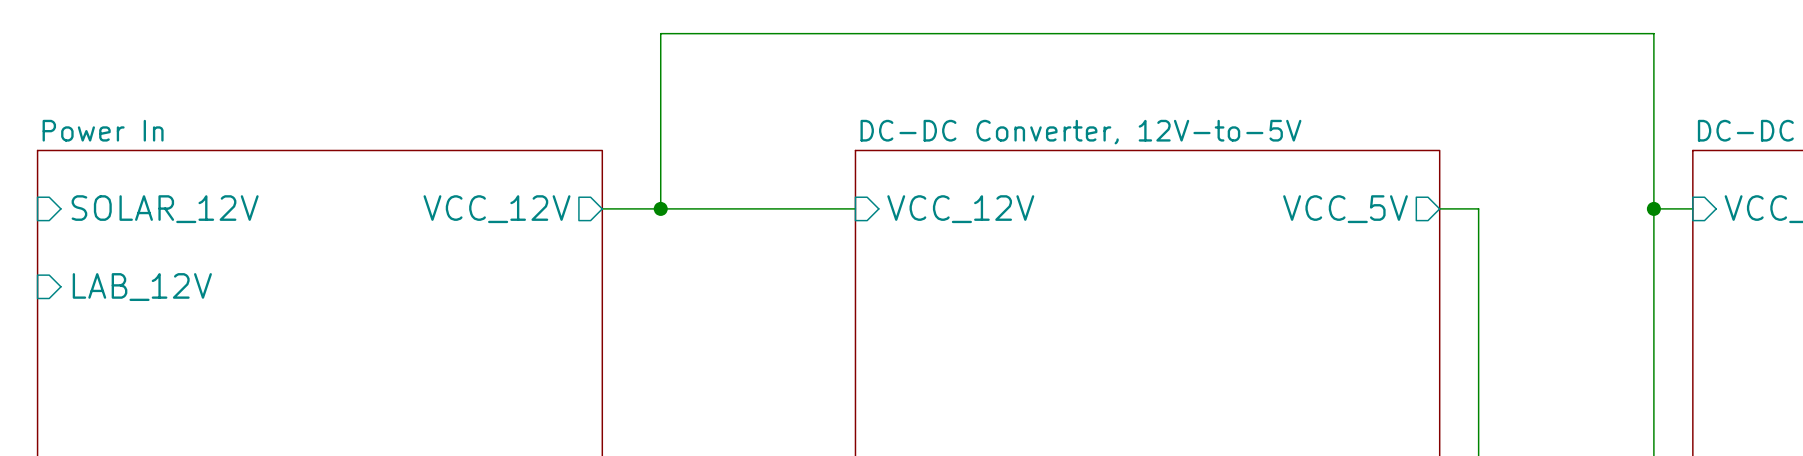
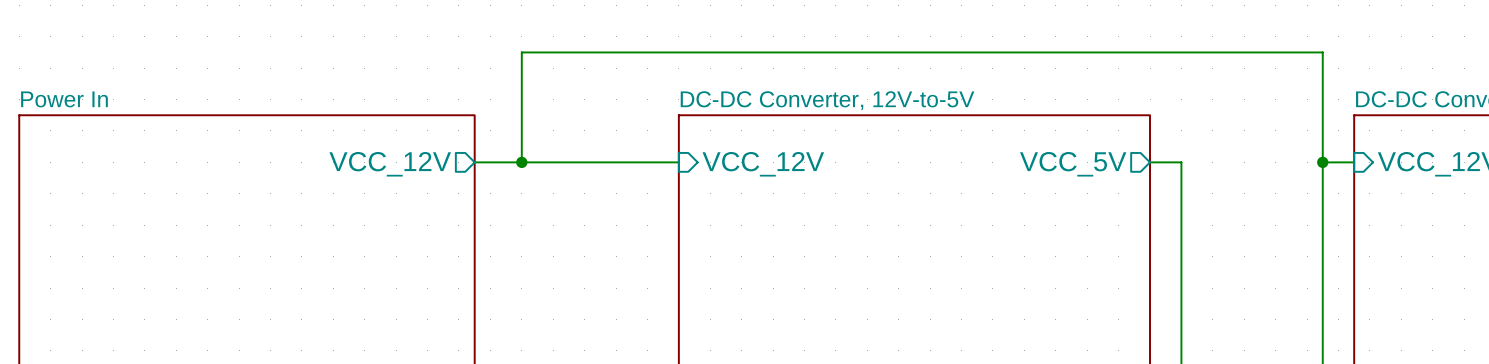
wire: (660, 72) (660, 33) (1653, 33) (1653, 72) -> (521, 52) (1322, 52)
sheet pin: SOLAR_12V (165, 209) -> none
sheet pin: LAB_12V (142, 287) -> none

